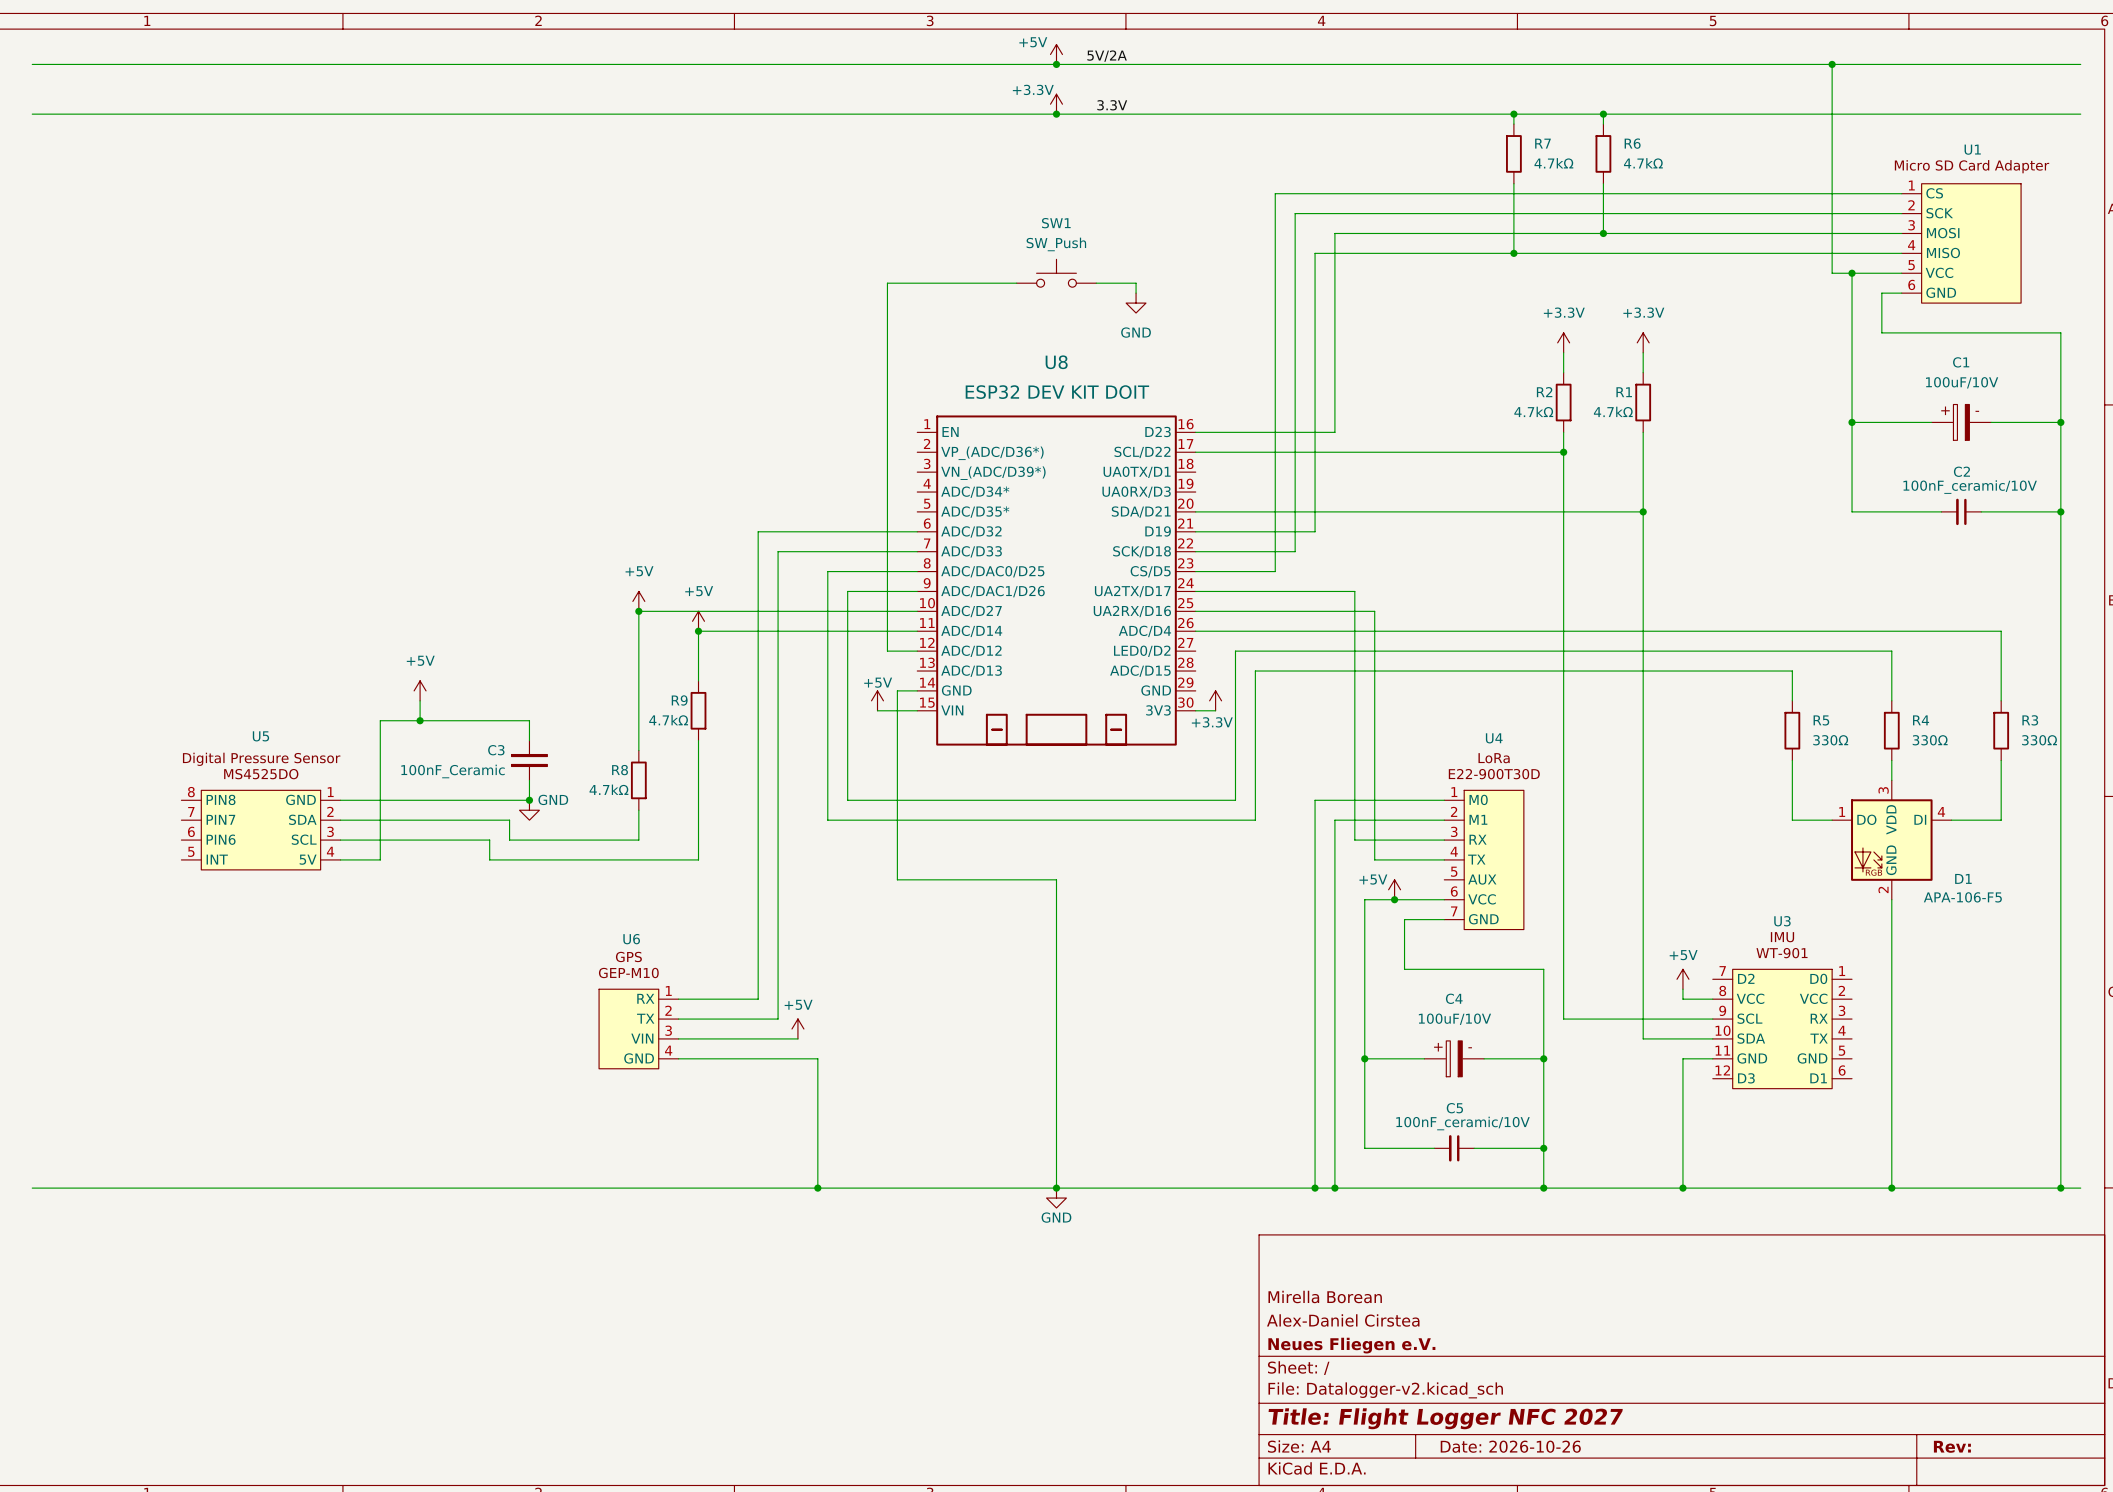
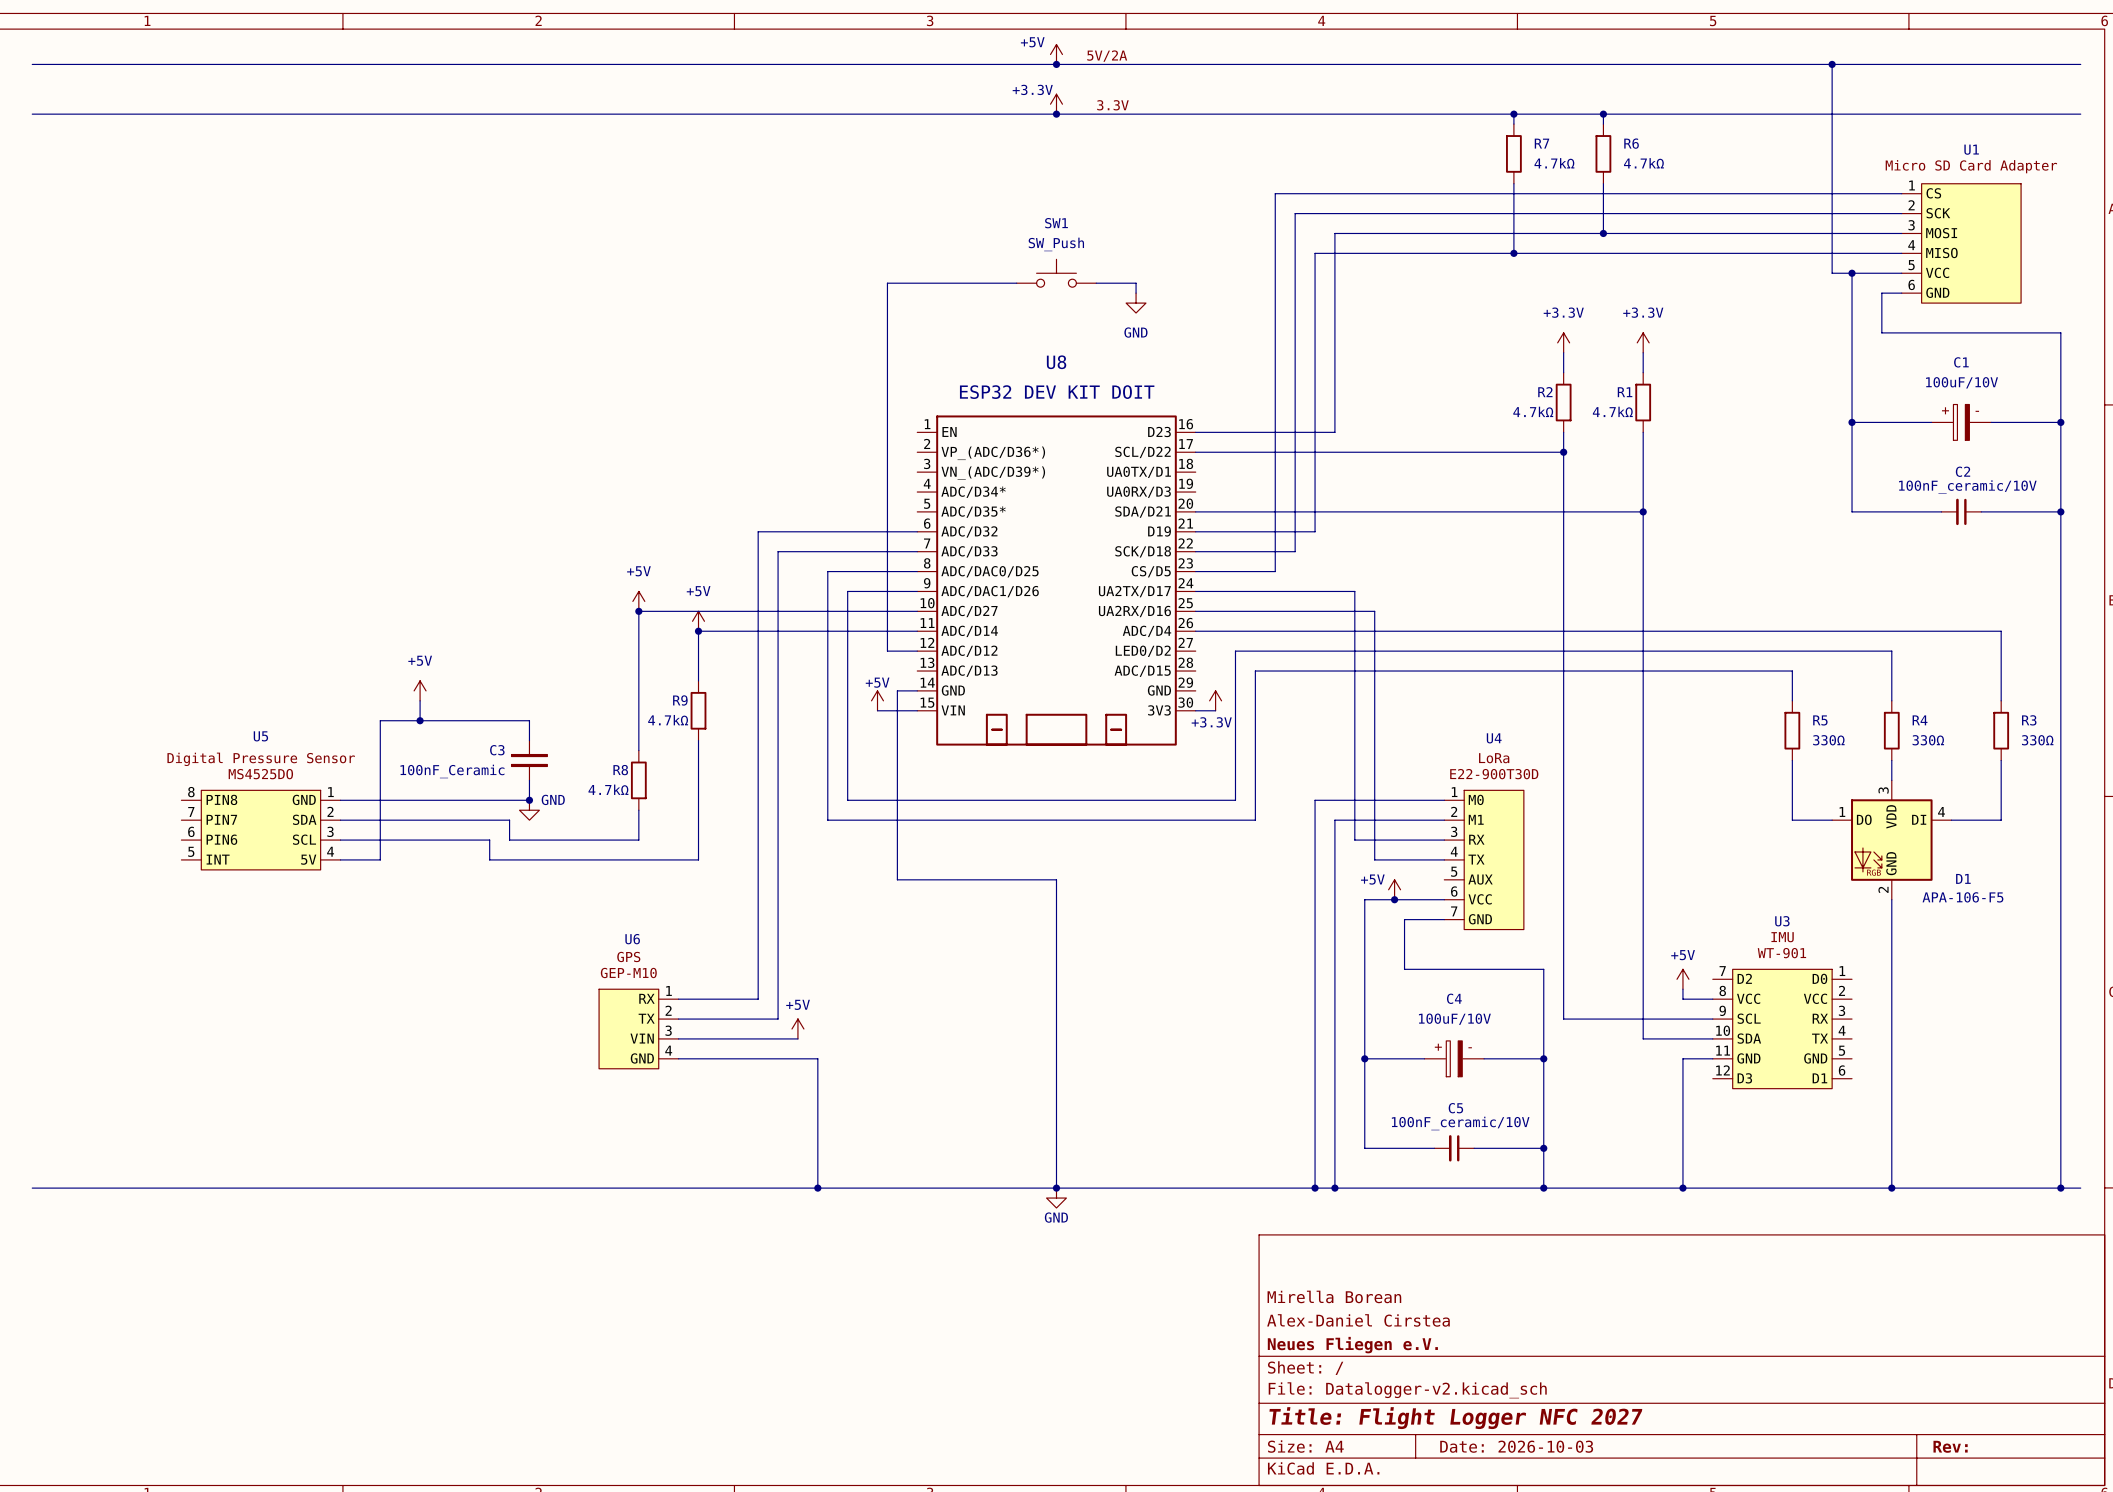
title block: Date: 2026-10-26 (1510, 1446) -> Date: 2026-10-03 (1516, 1446)

